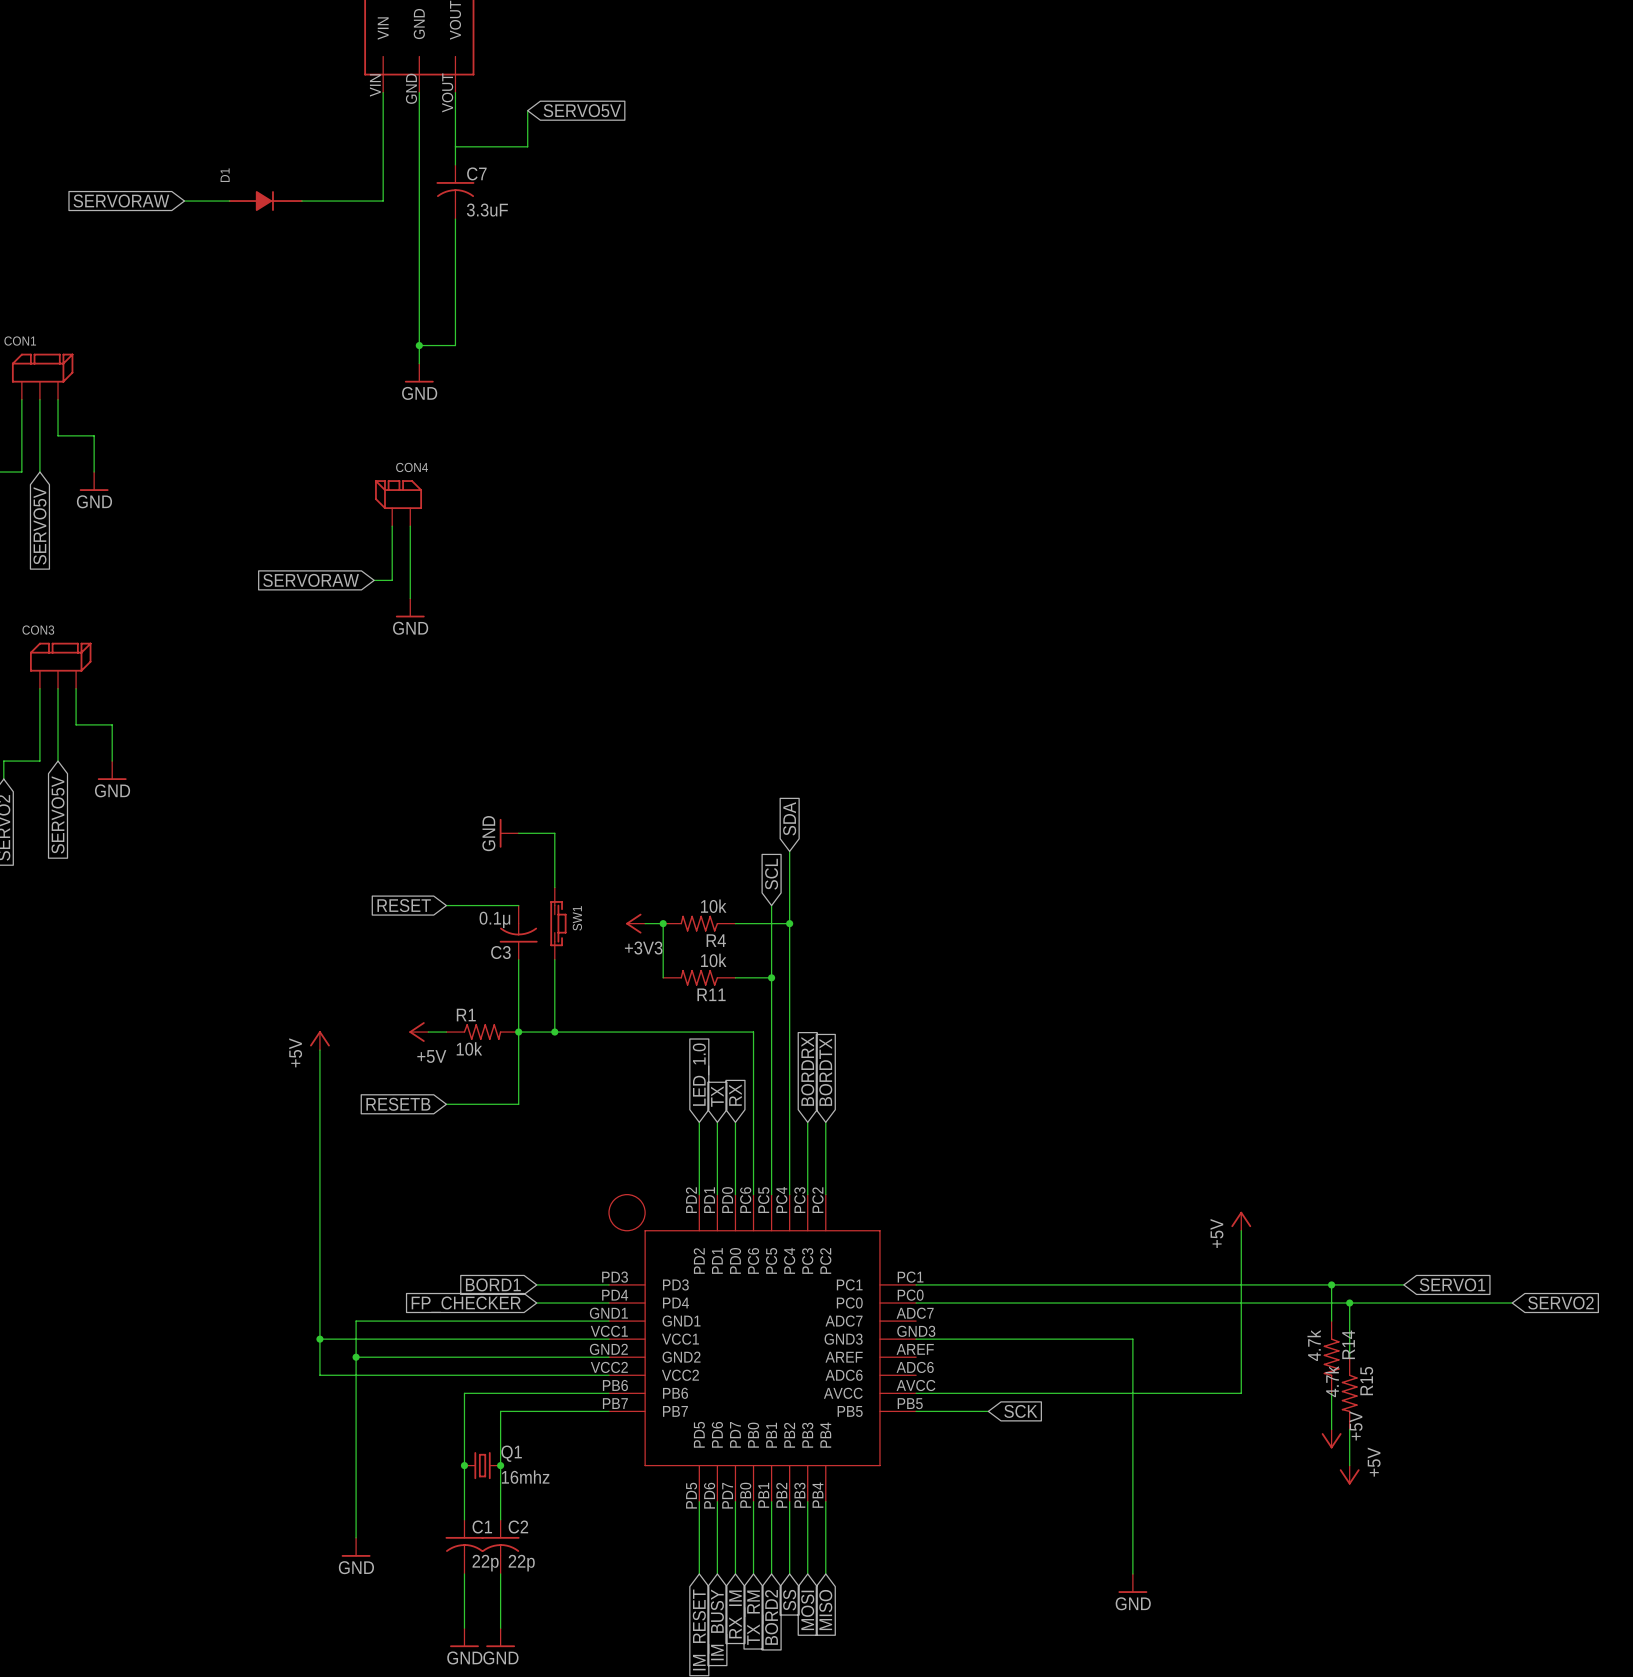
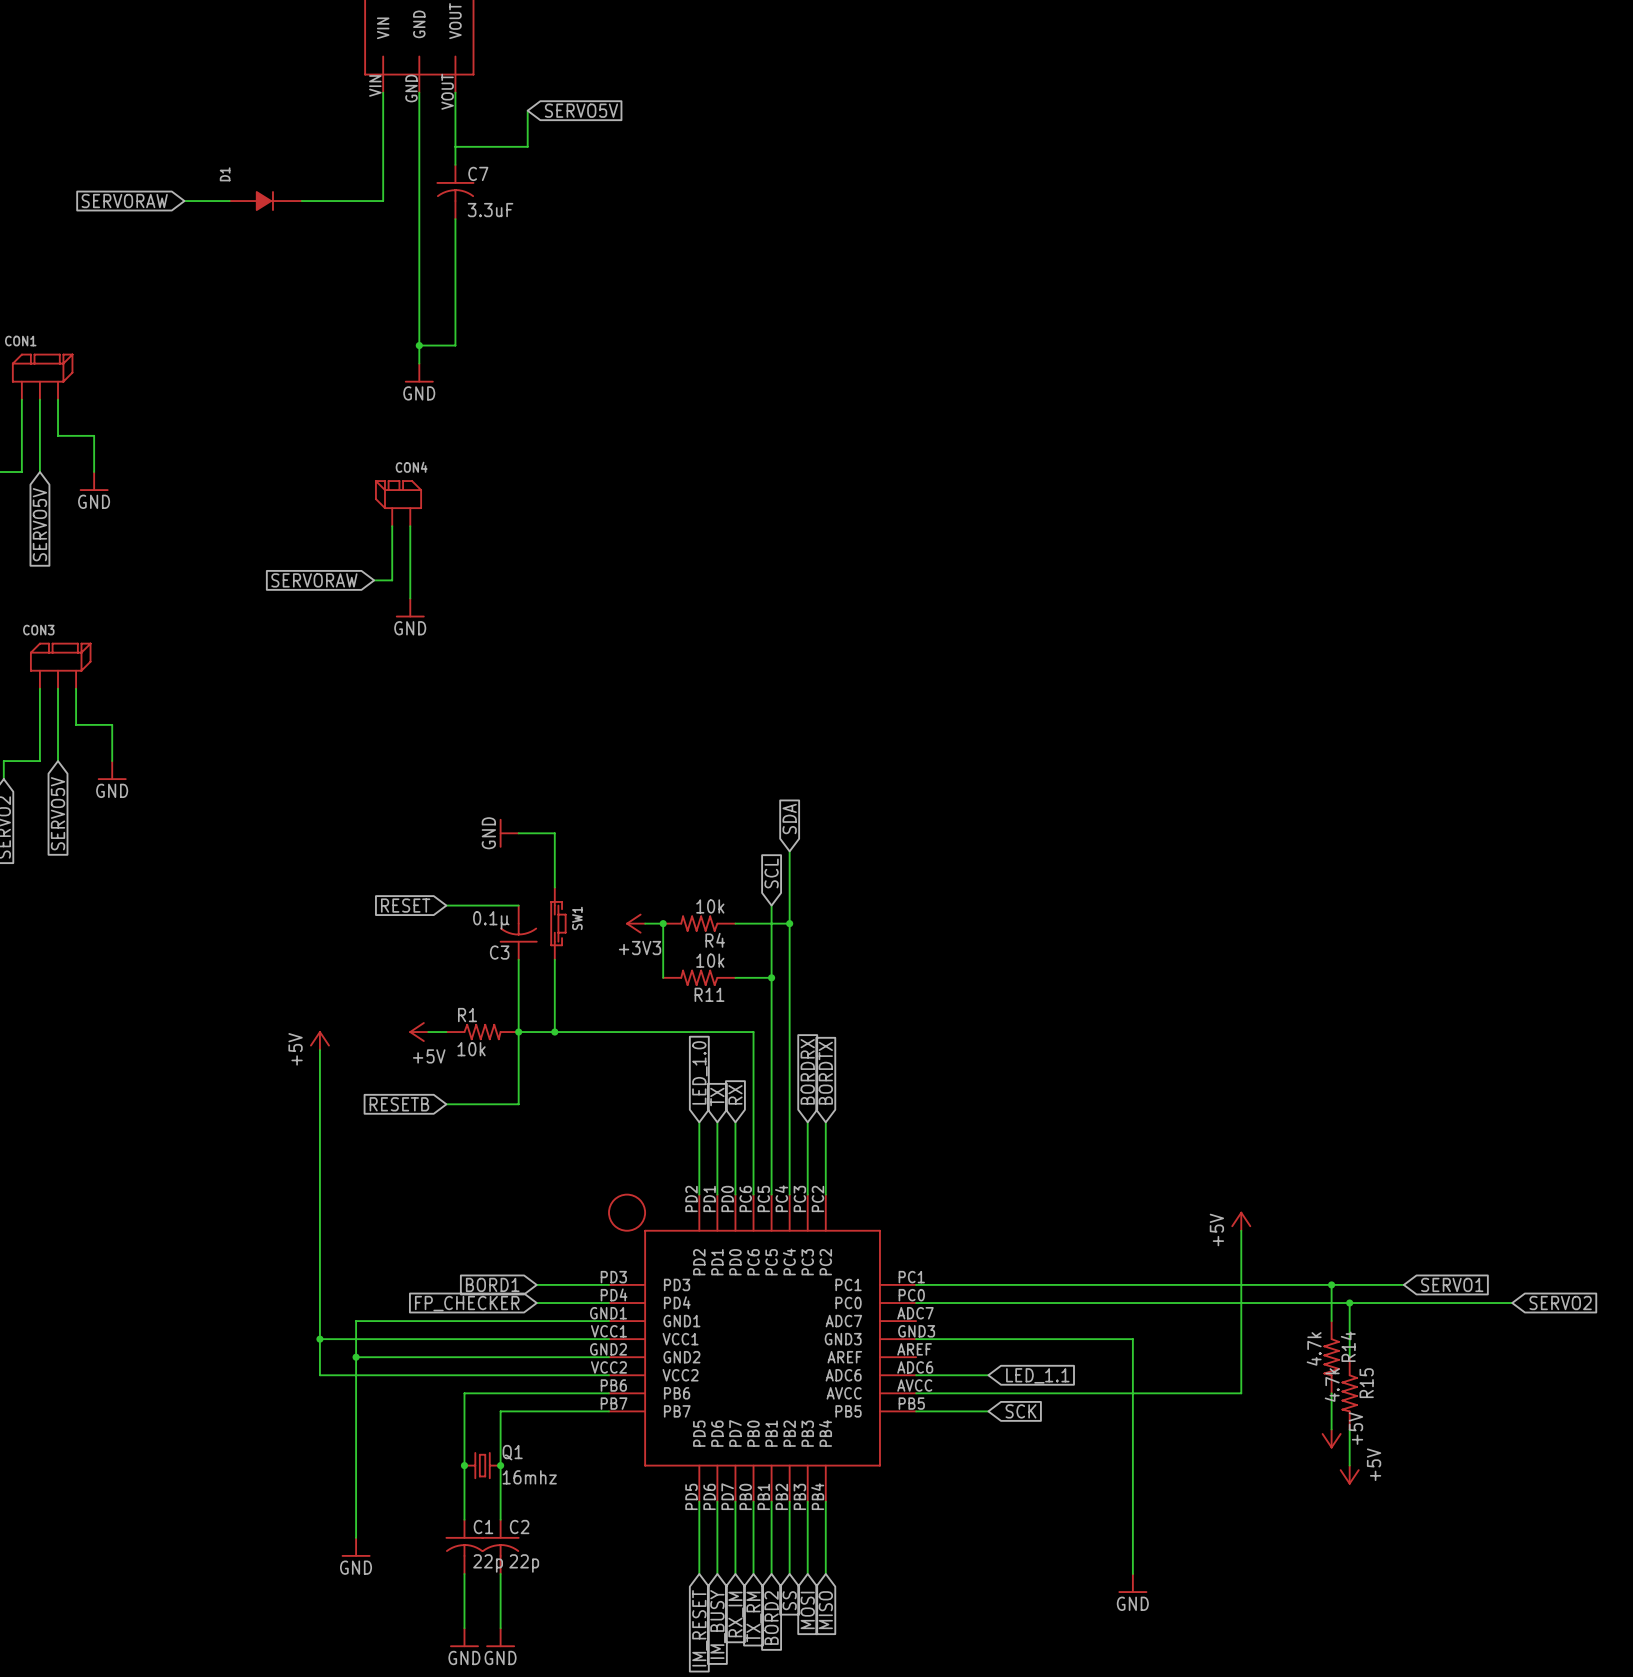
wire: none -> (916, 1375) (988, 1375)
global label: none -> LED_1.1 (1037, 1375)

